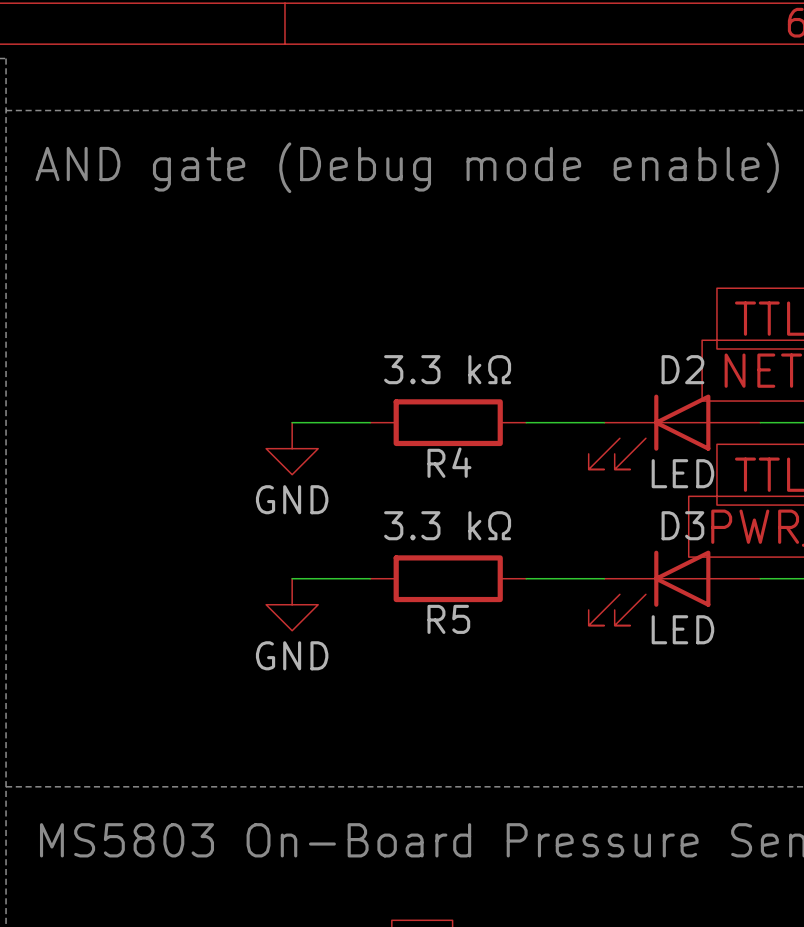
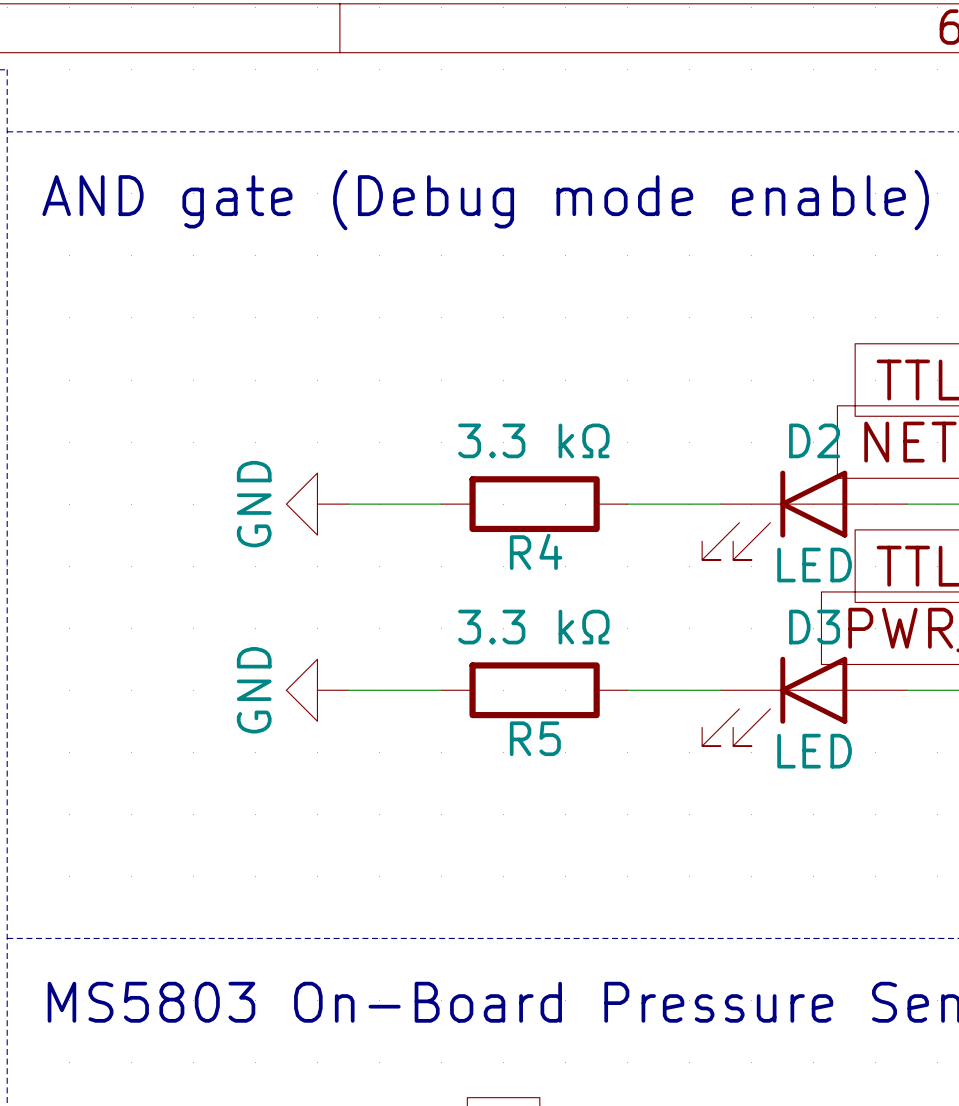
power symbol rotation: 0° (292, 448) -> 90° clockwise (317, 504)
power symbol position: GND (292, 448) -> GND (317, 504)
power symbol rotation: 0° (292, 604) -> 90° clockwise (317, 690)
power symbol position: GND (292, 604) -> GND (317, 690)

